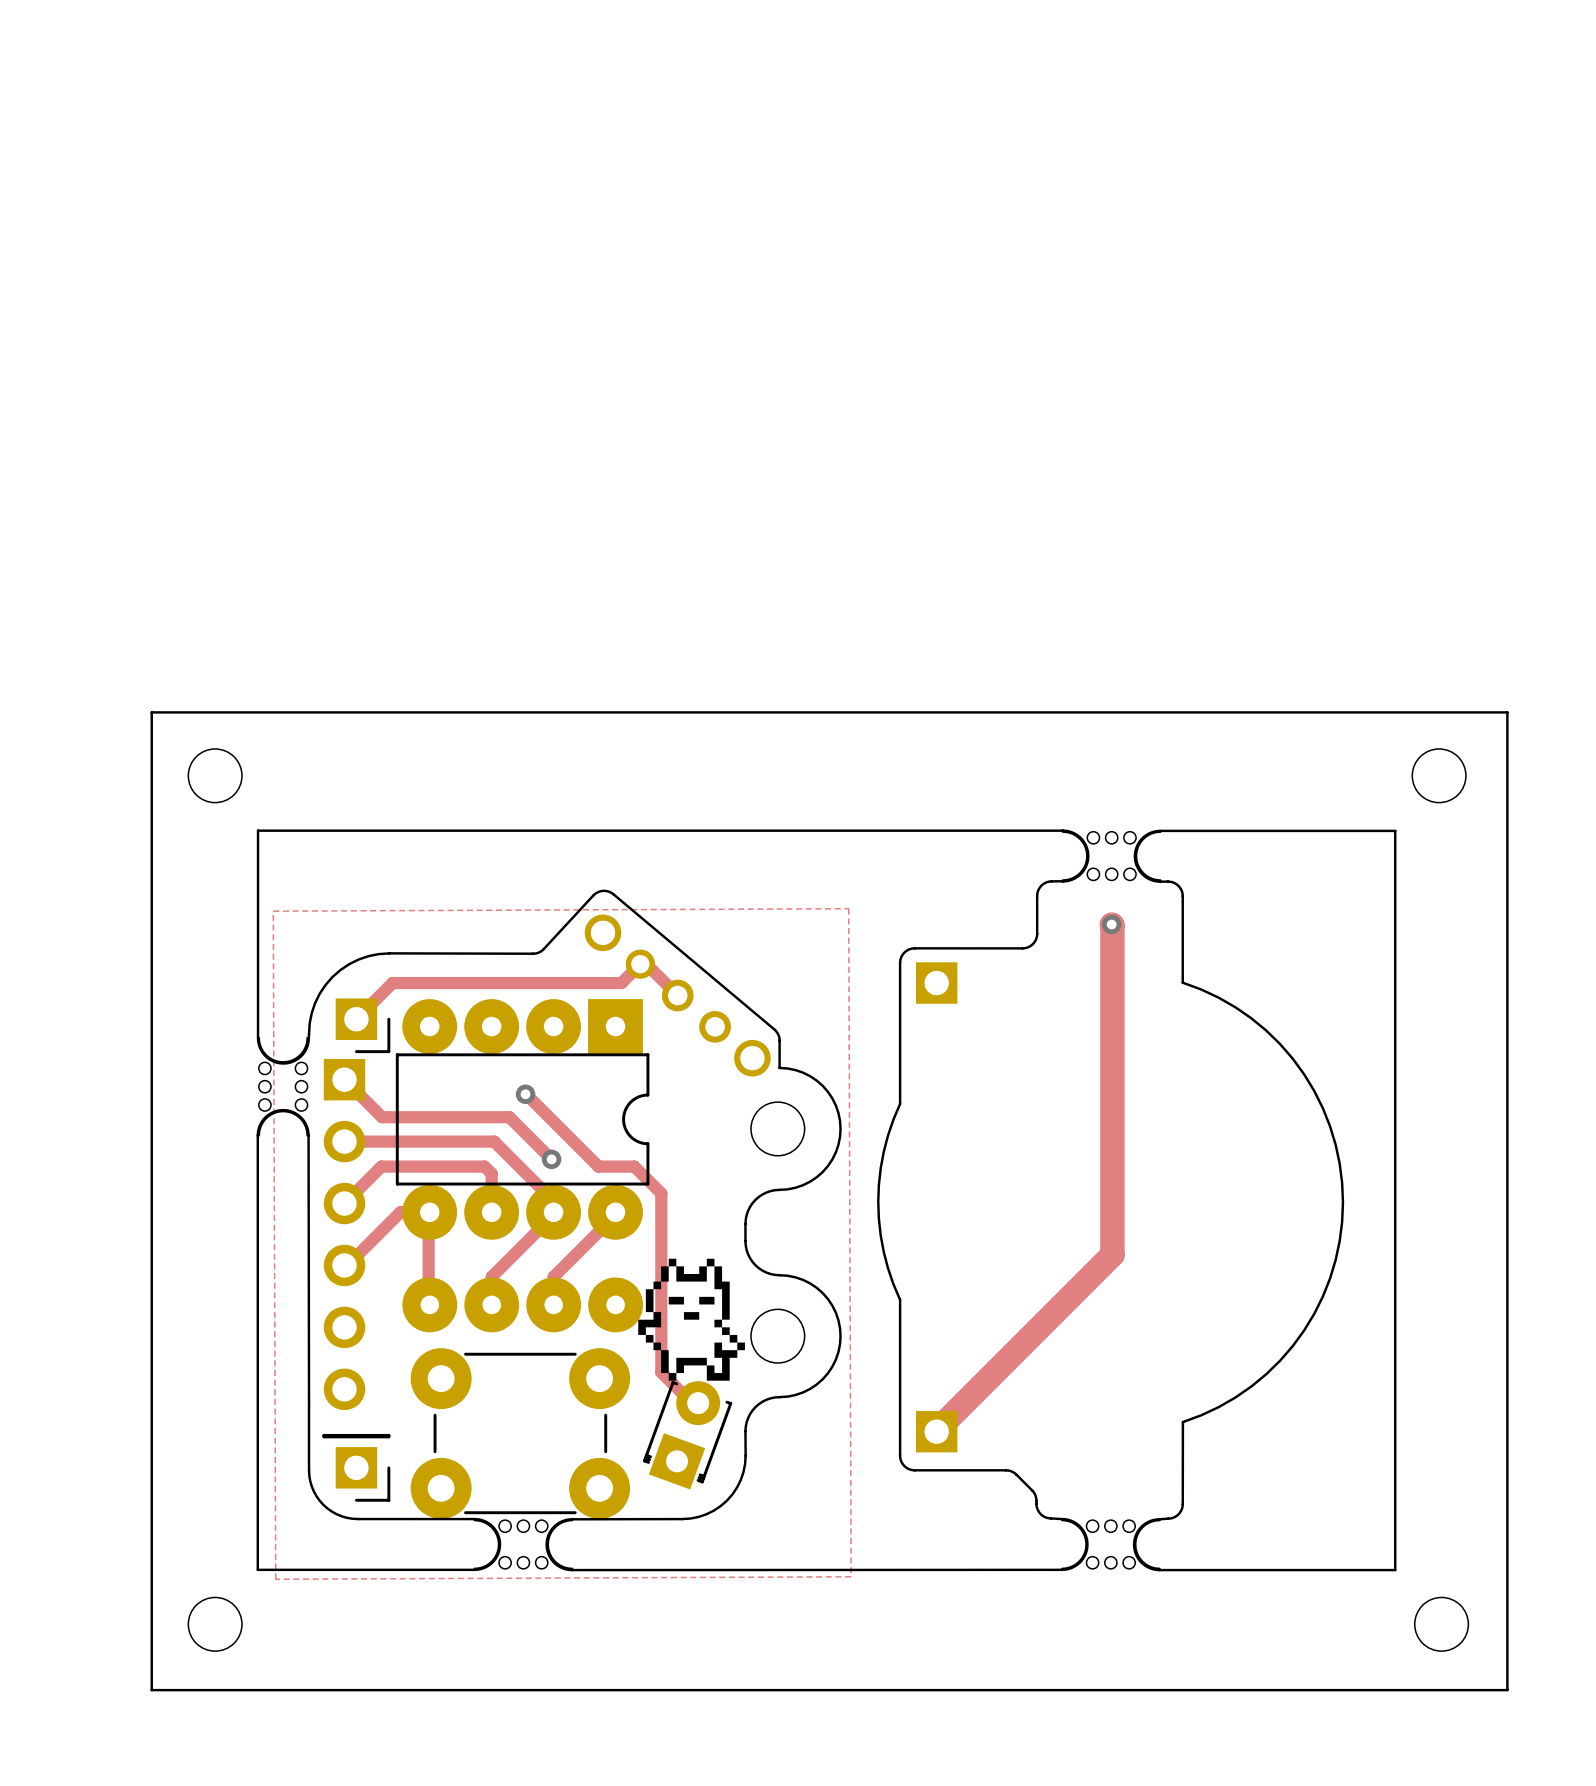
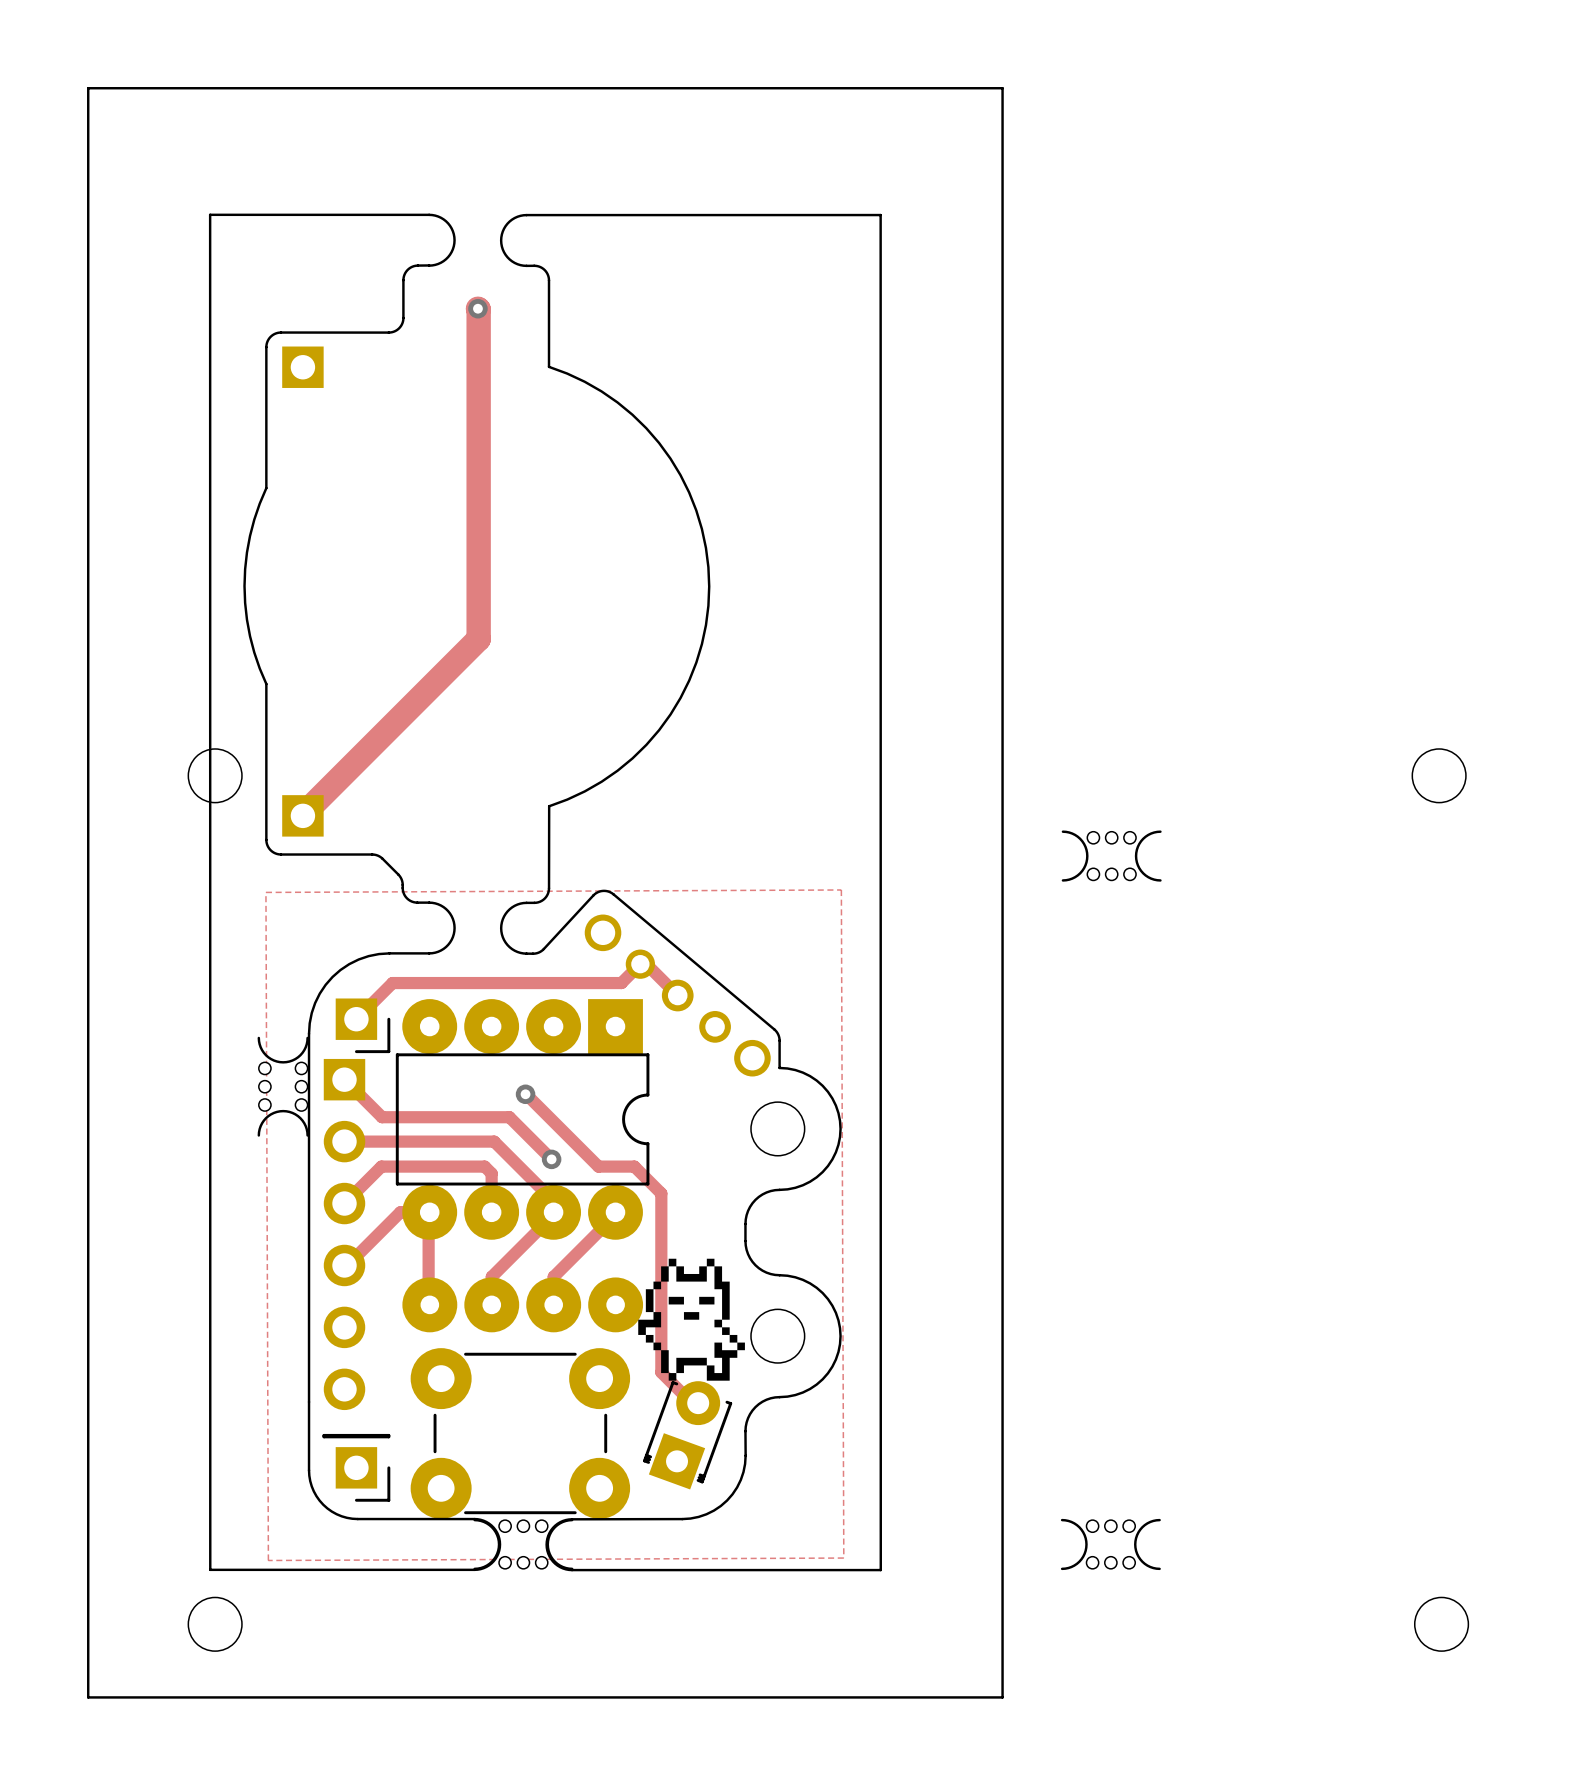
board edge: none -> (88, 88) (1002, 88) (1002, 1697) (88, 1697) (88, 88)
board edge: none -> (429, 265) (438, 263) (445, 259) (451, 252) (454, 243) (453, 234) (450, 225) (443, 219) (435, 215) (210, 214) (210, 1569) (257, 1569)
track: none -> (477, 308) (478, 639) (302, 815)
via: none -> (477, 308)
part: none -> (302, 367)
board edge: (151, 712) (1507, 712) (1507, 1690) (151, 1690) (151, 712) -> none
part: none -> (302, 815)
board edge: (1160, 830) (1395, 830) (1395, 1570) (1156, 1569) (1145, 1565) (1135, 1553) (1134, 1538) (1142, 1525) (1153, 1520) (1173, 1517) (1181, 1509) (1182, 1422) (1218, 1407) (1235, 1397) (1266, 1374) (1292, 1345) (1314, 1313) (1322, 1296) (1335, 1259) (1339, 1240) (1342, 1202) (1339, 1163) (1330, 1126) (1314, 1090) (1292, 1058) (1266, 1030) (1251, 1018) (1218, 997) (1182, 982) (1181, 891) (1172, 882) (1154, 880) (1145, 877) (1139, 870) (1135, 859) (1135, 850) (1141, 839) (1151, 832) (1160, 830) -> none
zone outline: (848, 908) (273, 911) (275, 1579) (851, 1576) (848, 908) -> (841, 889) (265, 892) (268, 1560) (843, 1558) (841, 889)
track: (1111, 924) (1112, 1254) (936, 1431) -> none
via: (1111, 924) -> none
board edge: (389, 953) (532, 953) -> (389, 953) (432, 953) (443, 948) (450, 942) (454, 931) (453, 921) (450, 913) (438, 904) (415, 902) (408, 899) (403, 893) (399, 876) (377, 855) (279, 854) (272, 851) (267, 845) (266, 684) (254, 652) (246, 619) (245, 569) (254, 519) (266, 488) (266, 347) (268, 339) (279, 332) (395, 331) (403, 321) (403, 280) (405, 272) (414, 266) (429, 265)
part: (936, 983) -> none
board edge: (309, 1033) (308, 1044) (304, 1052) (297, 1059) (289, 1062) (280, 1063) (271, 1060) (264, 1054) (258, 1044) (258, 830) (1062, 830) (1077, 835) (1085, 844) (1088, 852) (1087, 862) (1079, 875) (1068, 880) (1047, 881) (1039, 888) (1037, 896) (1037, 935) (1030, 946) (1022, 948) (913, 948) (902, 955) (900, 962) (900, 1103) (883, 1151) (878, 1201) (883, 1252) (900, 1299) (900, 1455) (902, 1463) (913, 1470) (1006, 1470) (1013, 1472) (1033, 1491) (1037, 1509) (1042, 1515) (1049, 1518) (1071, 1520) (1081, 1527) (1085, 1535) (1087, 1544) (1082, 1558) (1073, 1566) (1062, 1569) (572, 1570) -> (532, 953) (520, 952) (509, 947) (502, 937) (501, 925) (505, 913) (512, 907) (520, 903) (540, 901) (547, 893) (549, 806) (584, 791) (617, 770) (632, 758) (659, 730) (680, 697) (696, 662) (705, 625) (709, 586) (708, 567) (701, 528) (696, 510) (680, 475) (659, 442) (632, 414) (601, 391) (567, 373) (549, 366) (548, 275) (540, 267) (520, 265) (507, 257) (501, 243) (504, 228) (512, 219) (526, 215) (880, 215) (880, 1570) (572, 1570)
board edge: (309, 1402) (308, 1132) (305, 1123) (300, 1116) (289, 1110) (280, 1110) (271, 1113) (264, 1118) (259, 1126) (257, 1135) (257, 1569) -> (309, 1402) (309, 1033)
part: (936, 1431) -> none

